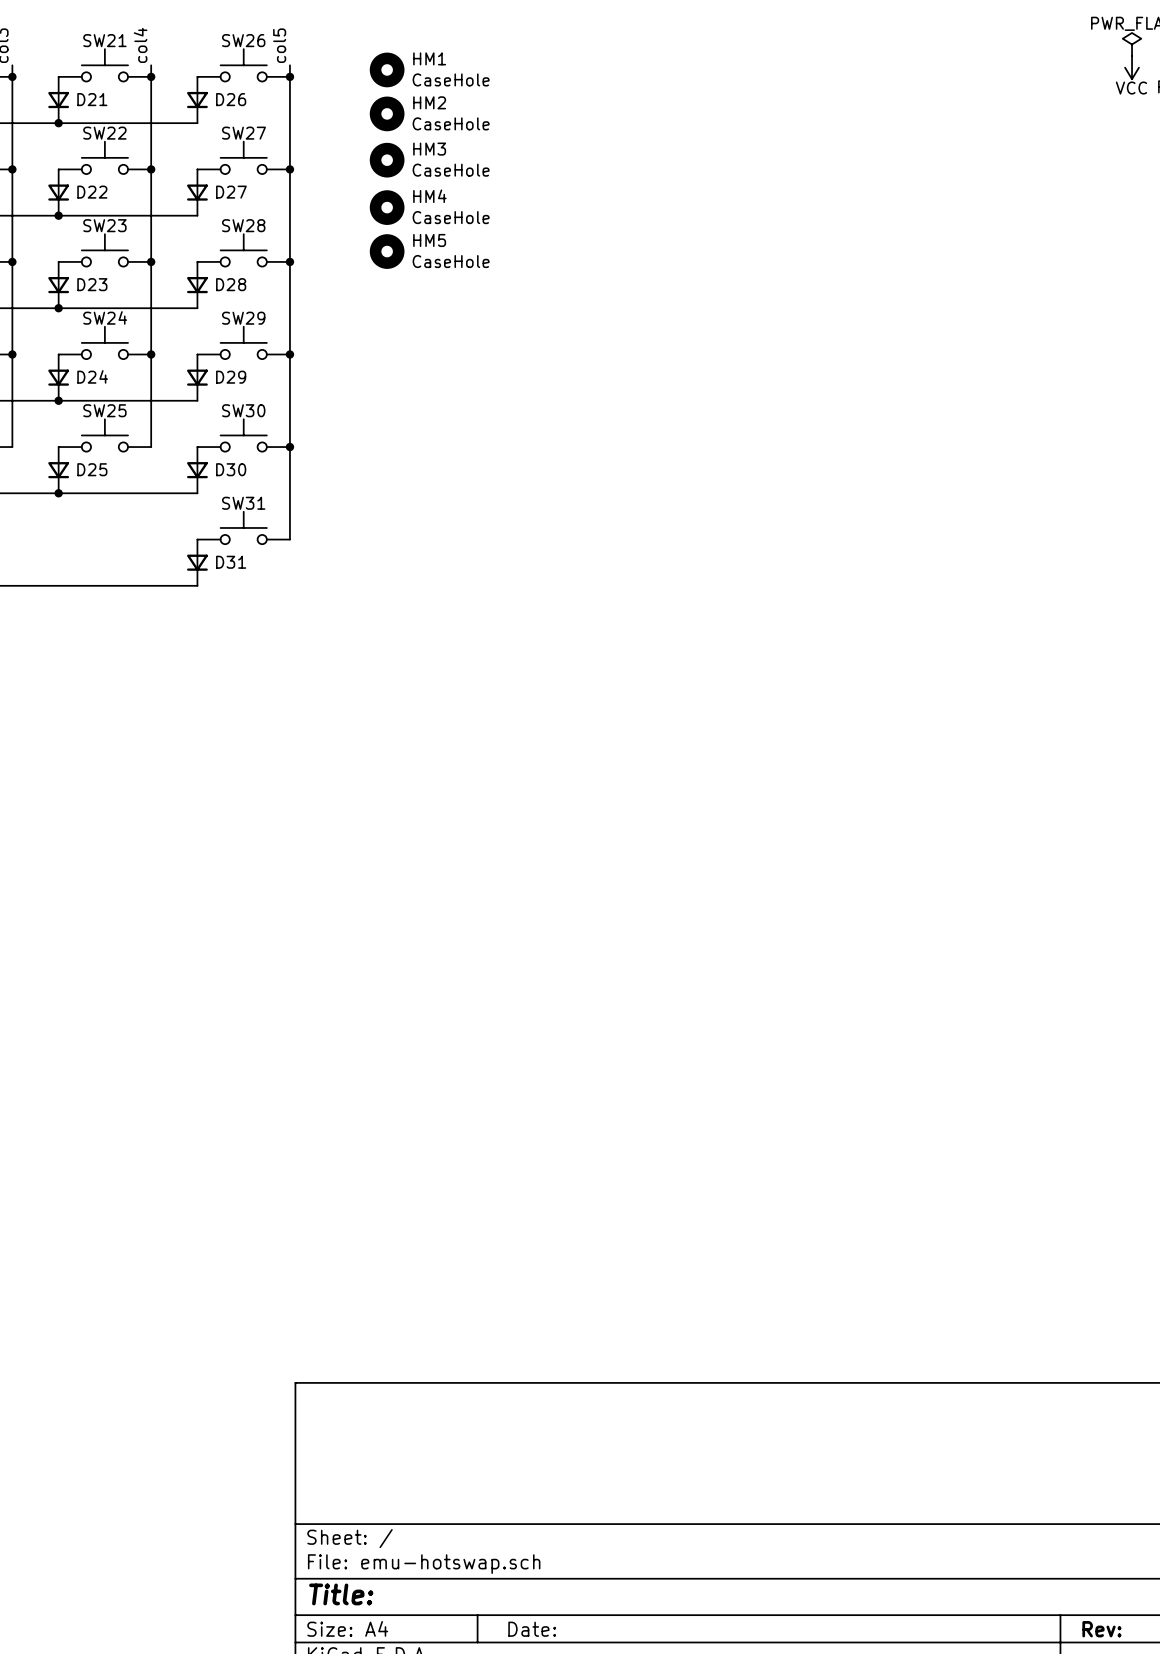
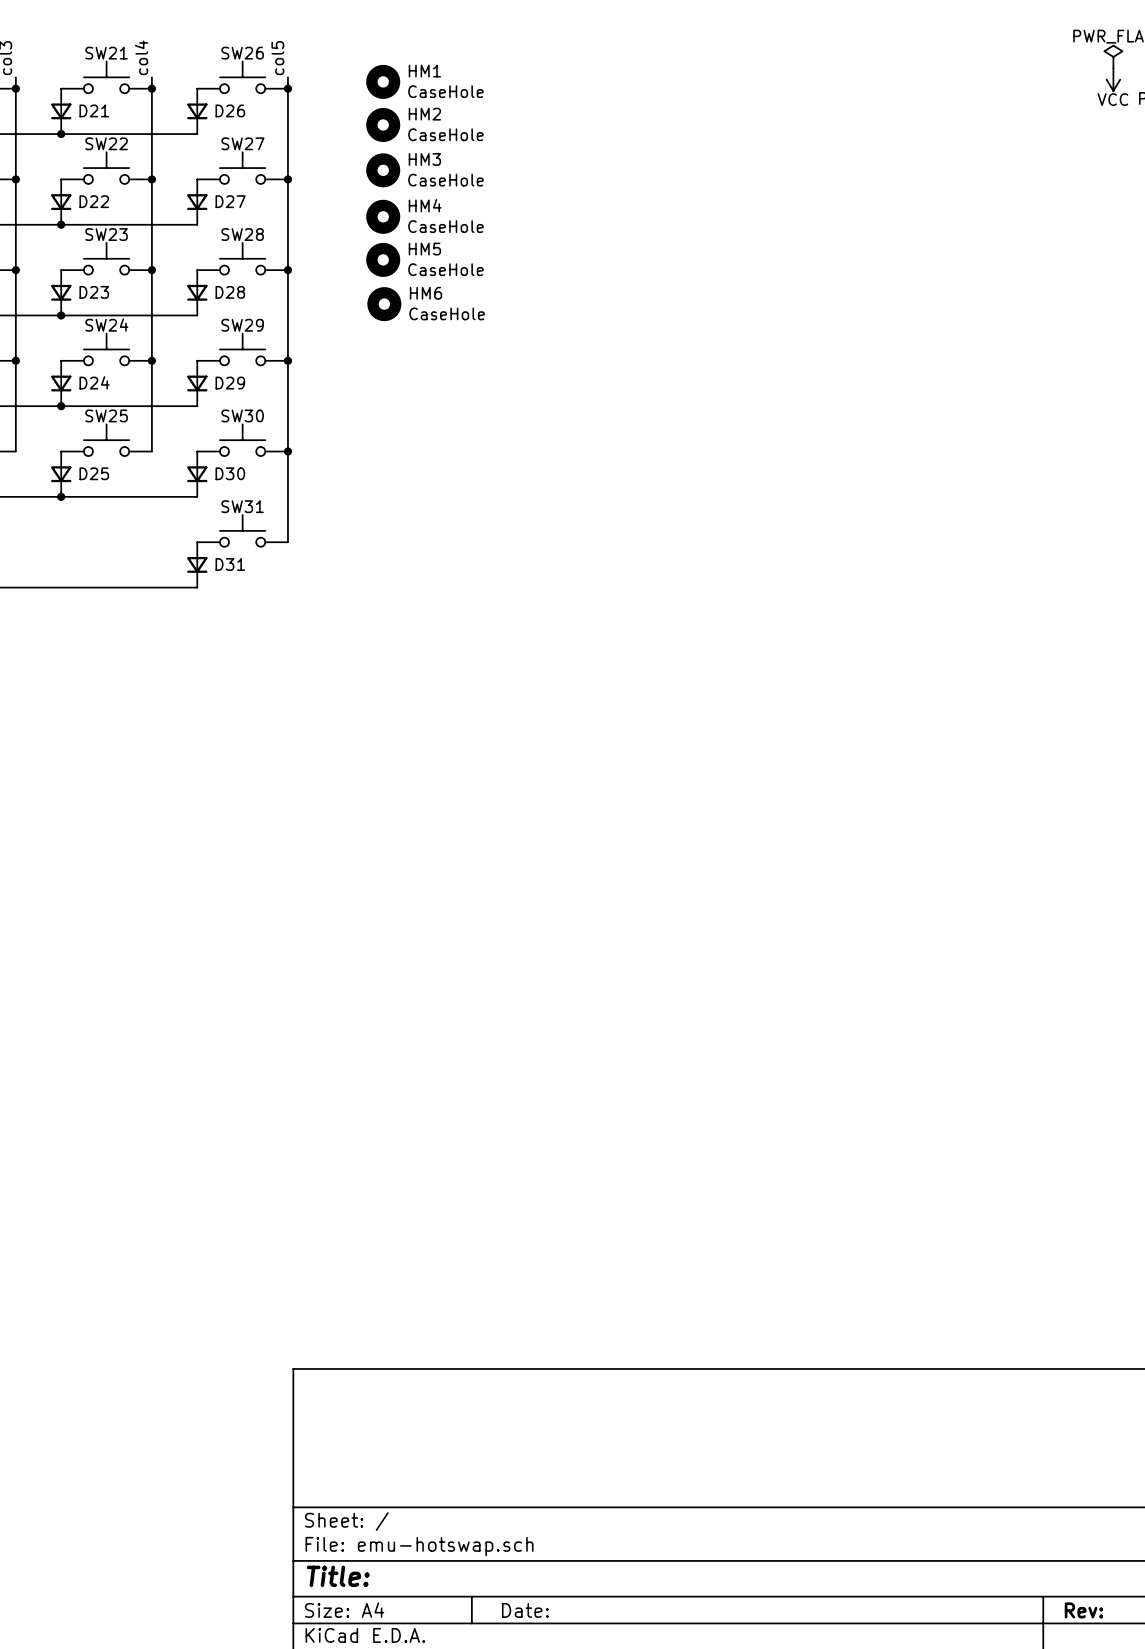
HM6: none -> CaseHole (384, 304)

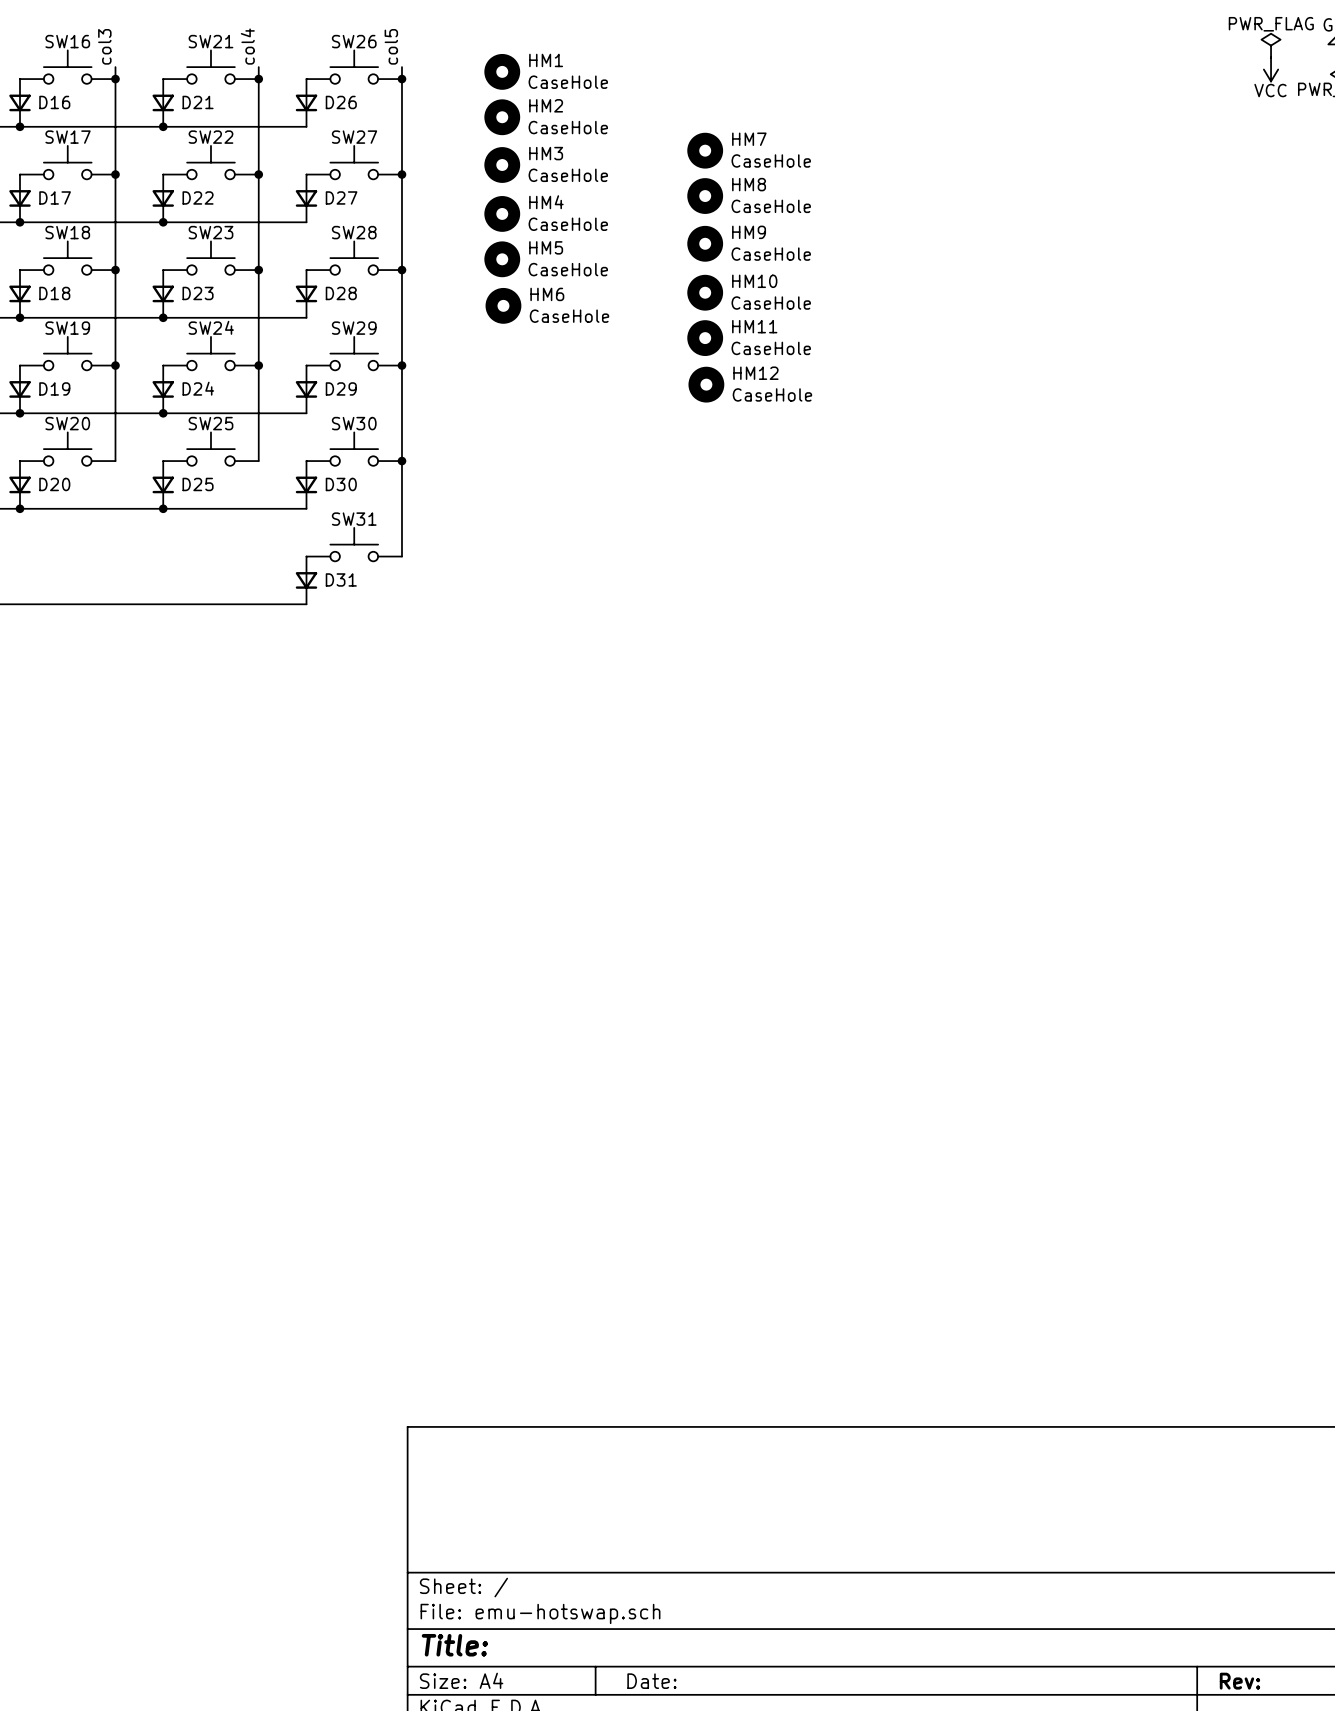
HM7: none -> CaseHole (705, 150)
HM8: none -> CaseHole (705, 196)
HM9: none -> CaseHole (705, 243)
HM10: none -> CaseHole (705, 292)
HM11: none -> CaseHole (705, 338)
HM12: none -> CaseHole (706, 384)

